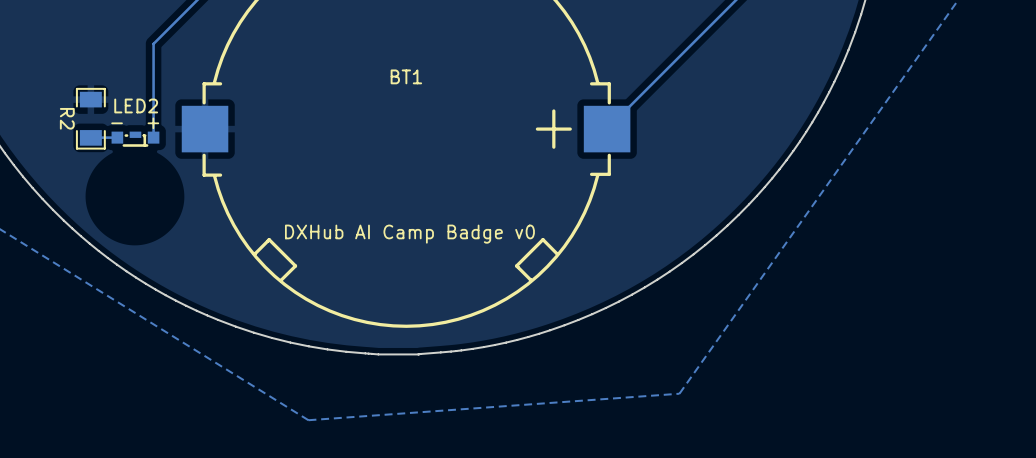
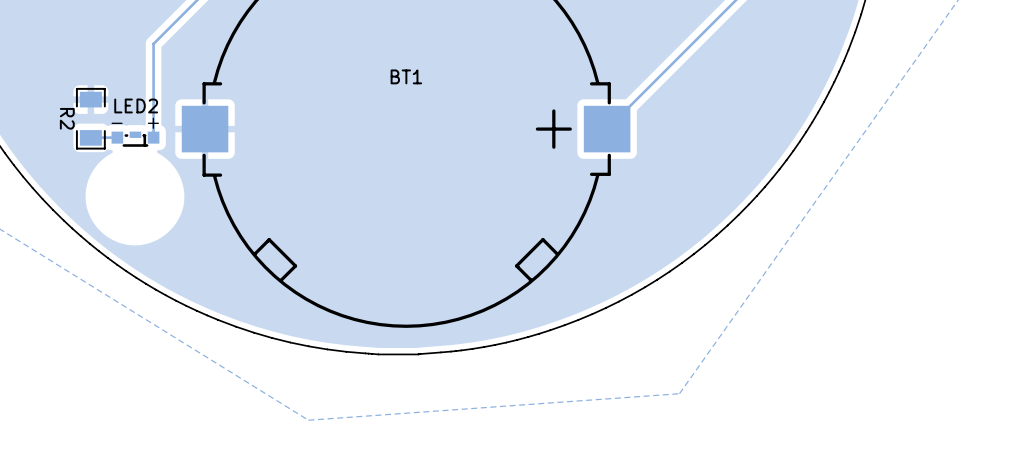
text: DXHub AI Camp Badge v0 (409, 234) -> none

